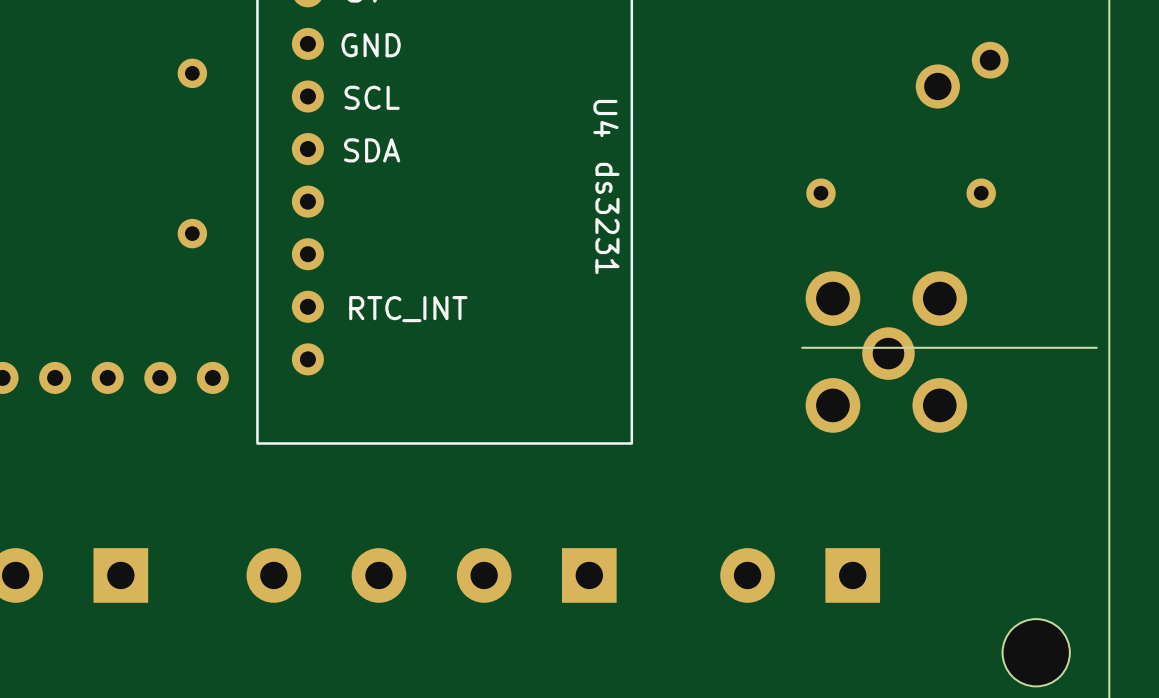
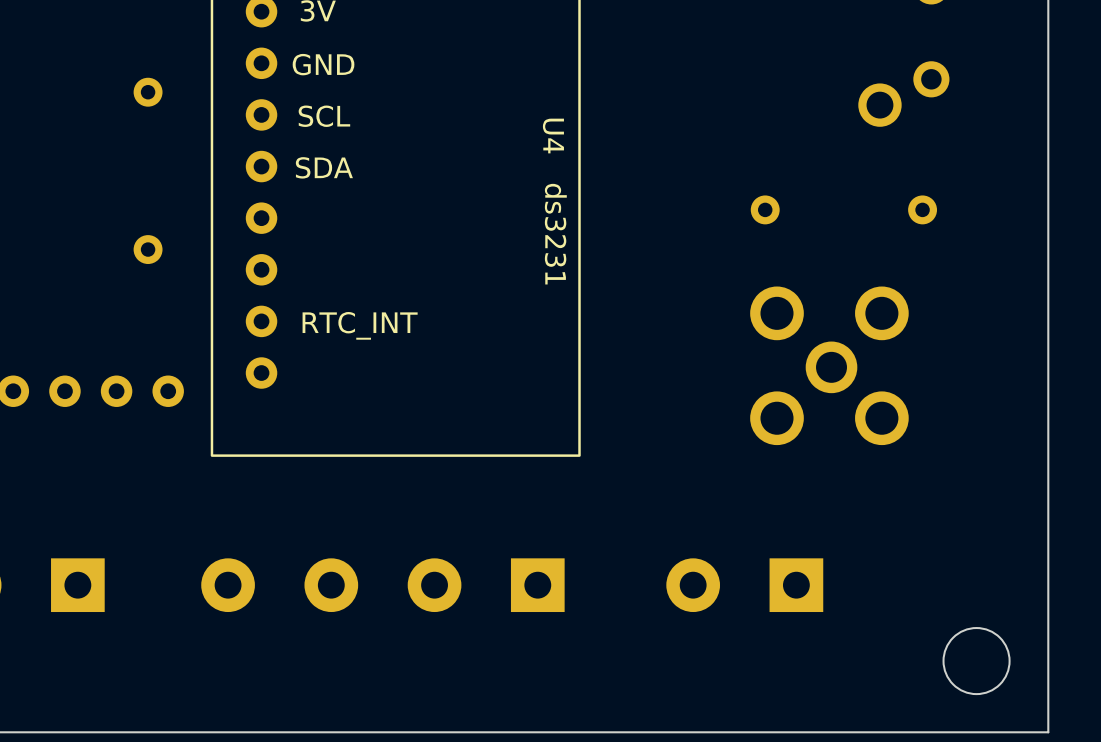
board edge: (1096, 347) (802, 347) -> none

